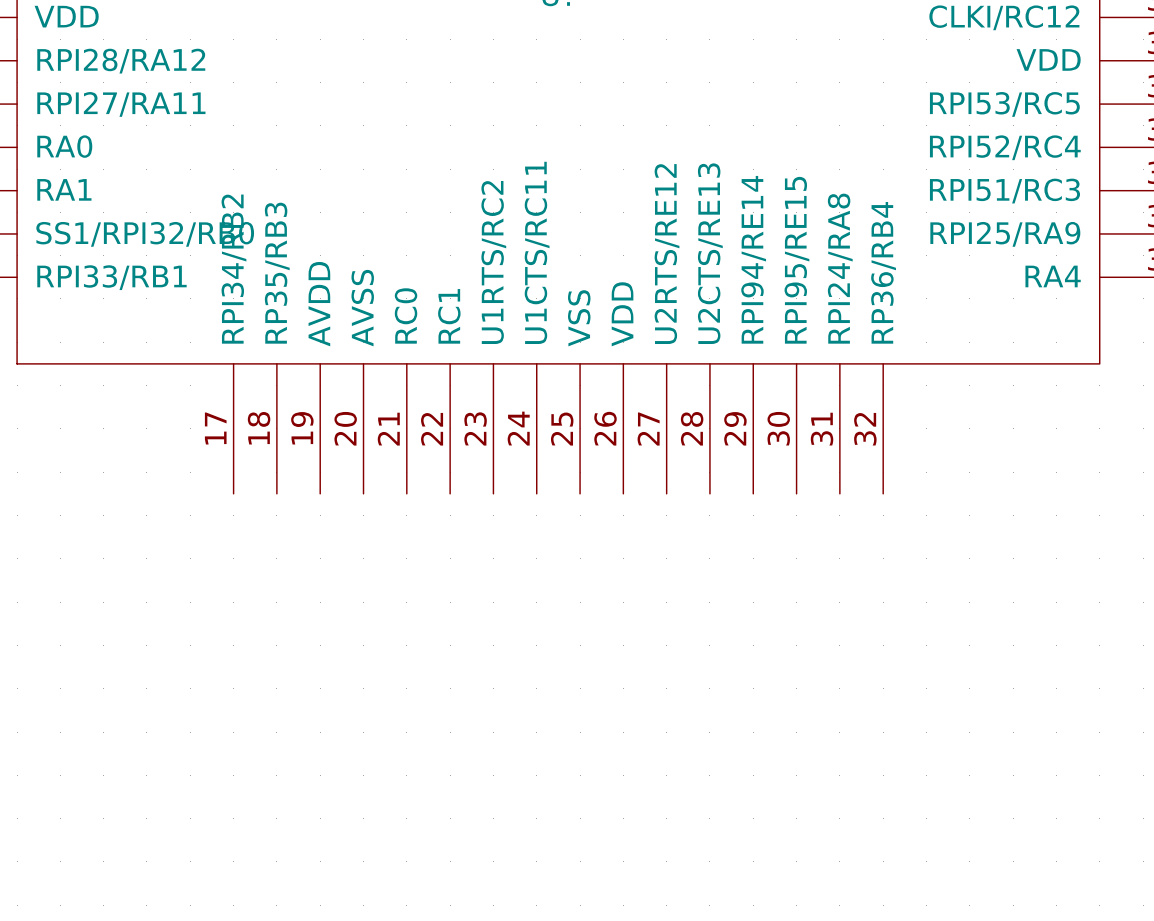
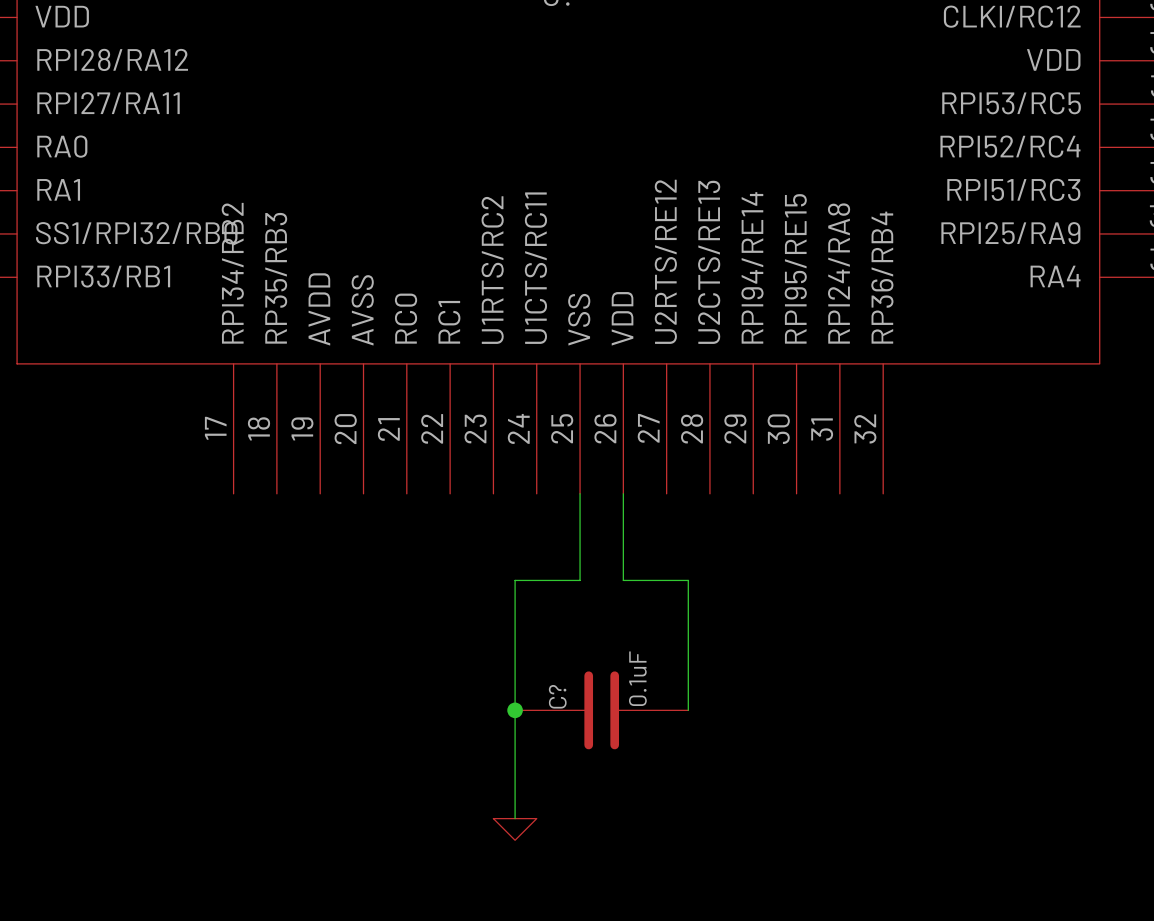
wire: none -> (580, 493) (580, 580) (515, 580) (515, 818)
wire: none -> (623, 493) (623, 580) (688, 580) (688, 710)
junction: none -> (515, 710)
C?: none -> 0.1uF (601, 710)
power symbol: none -> (515, 829)

